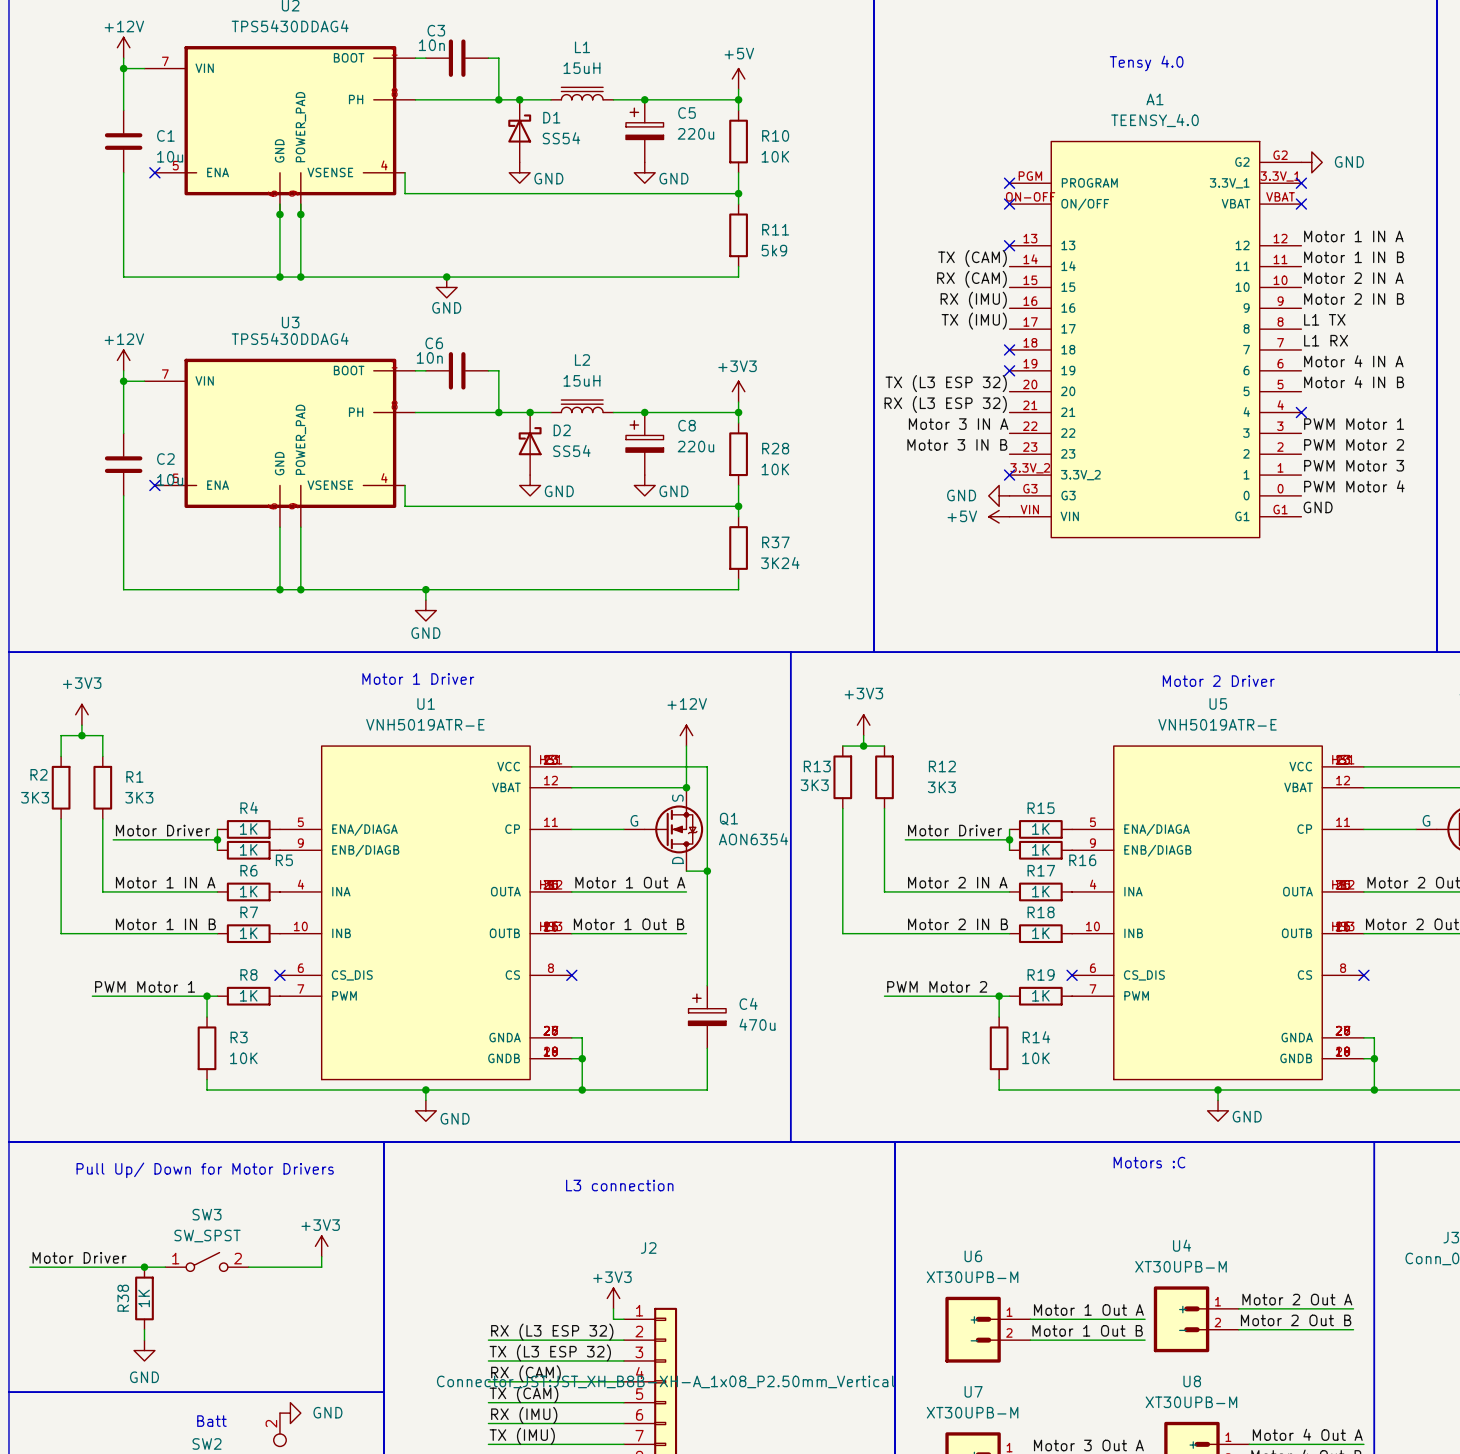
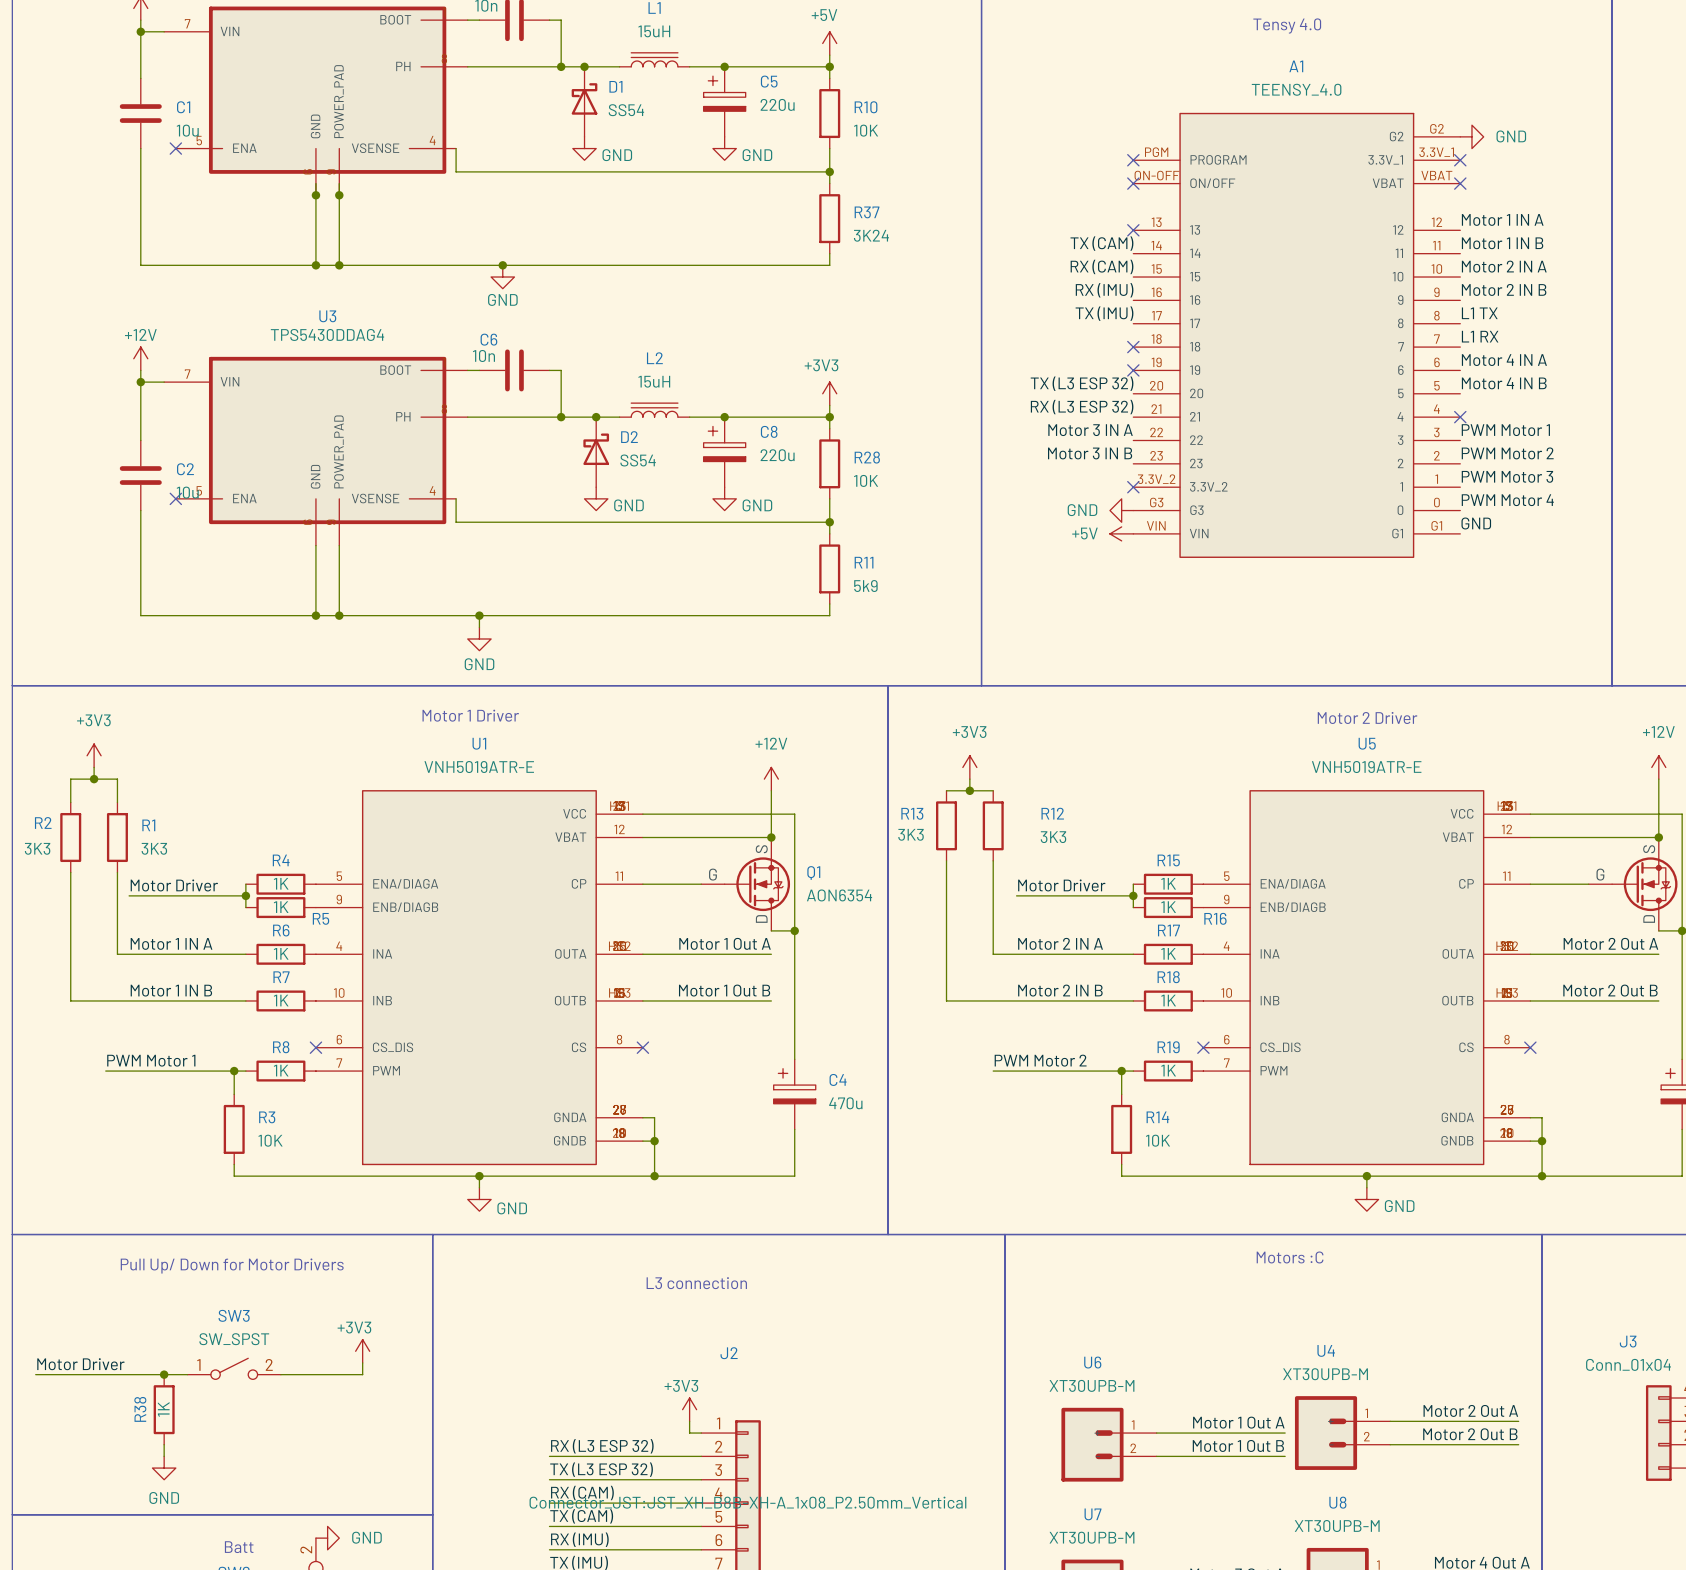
R11 name: R11 (775, 229) -> R37 (867, 212)
R11 value: 5k9 (774, 250) -> 3K24 (871, 235)
R37 name: R37 (775, 542) -> R11 (864, 562)
R37 value: 3K24 (780, 563) -> 5k9 (865, 586)

